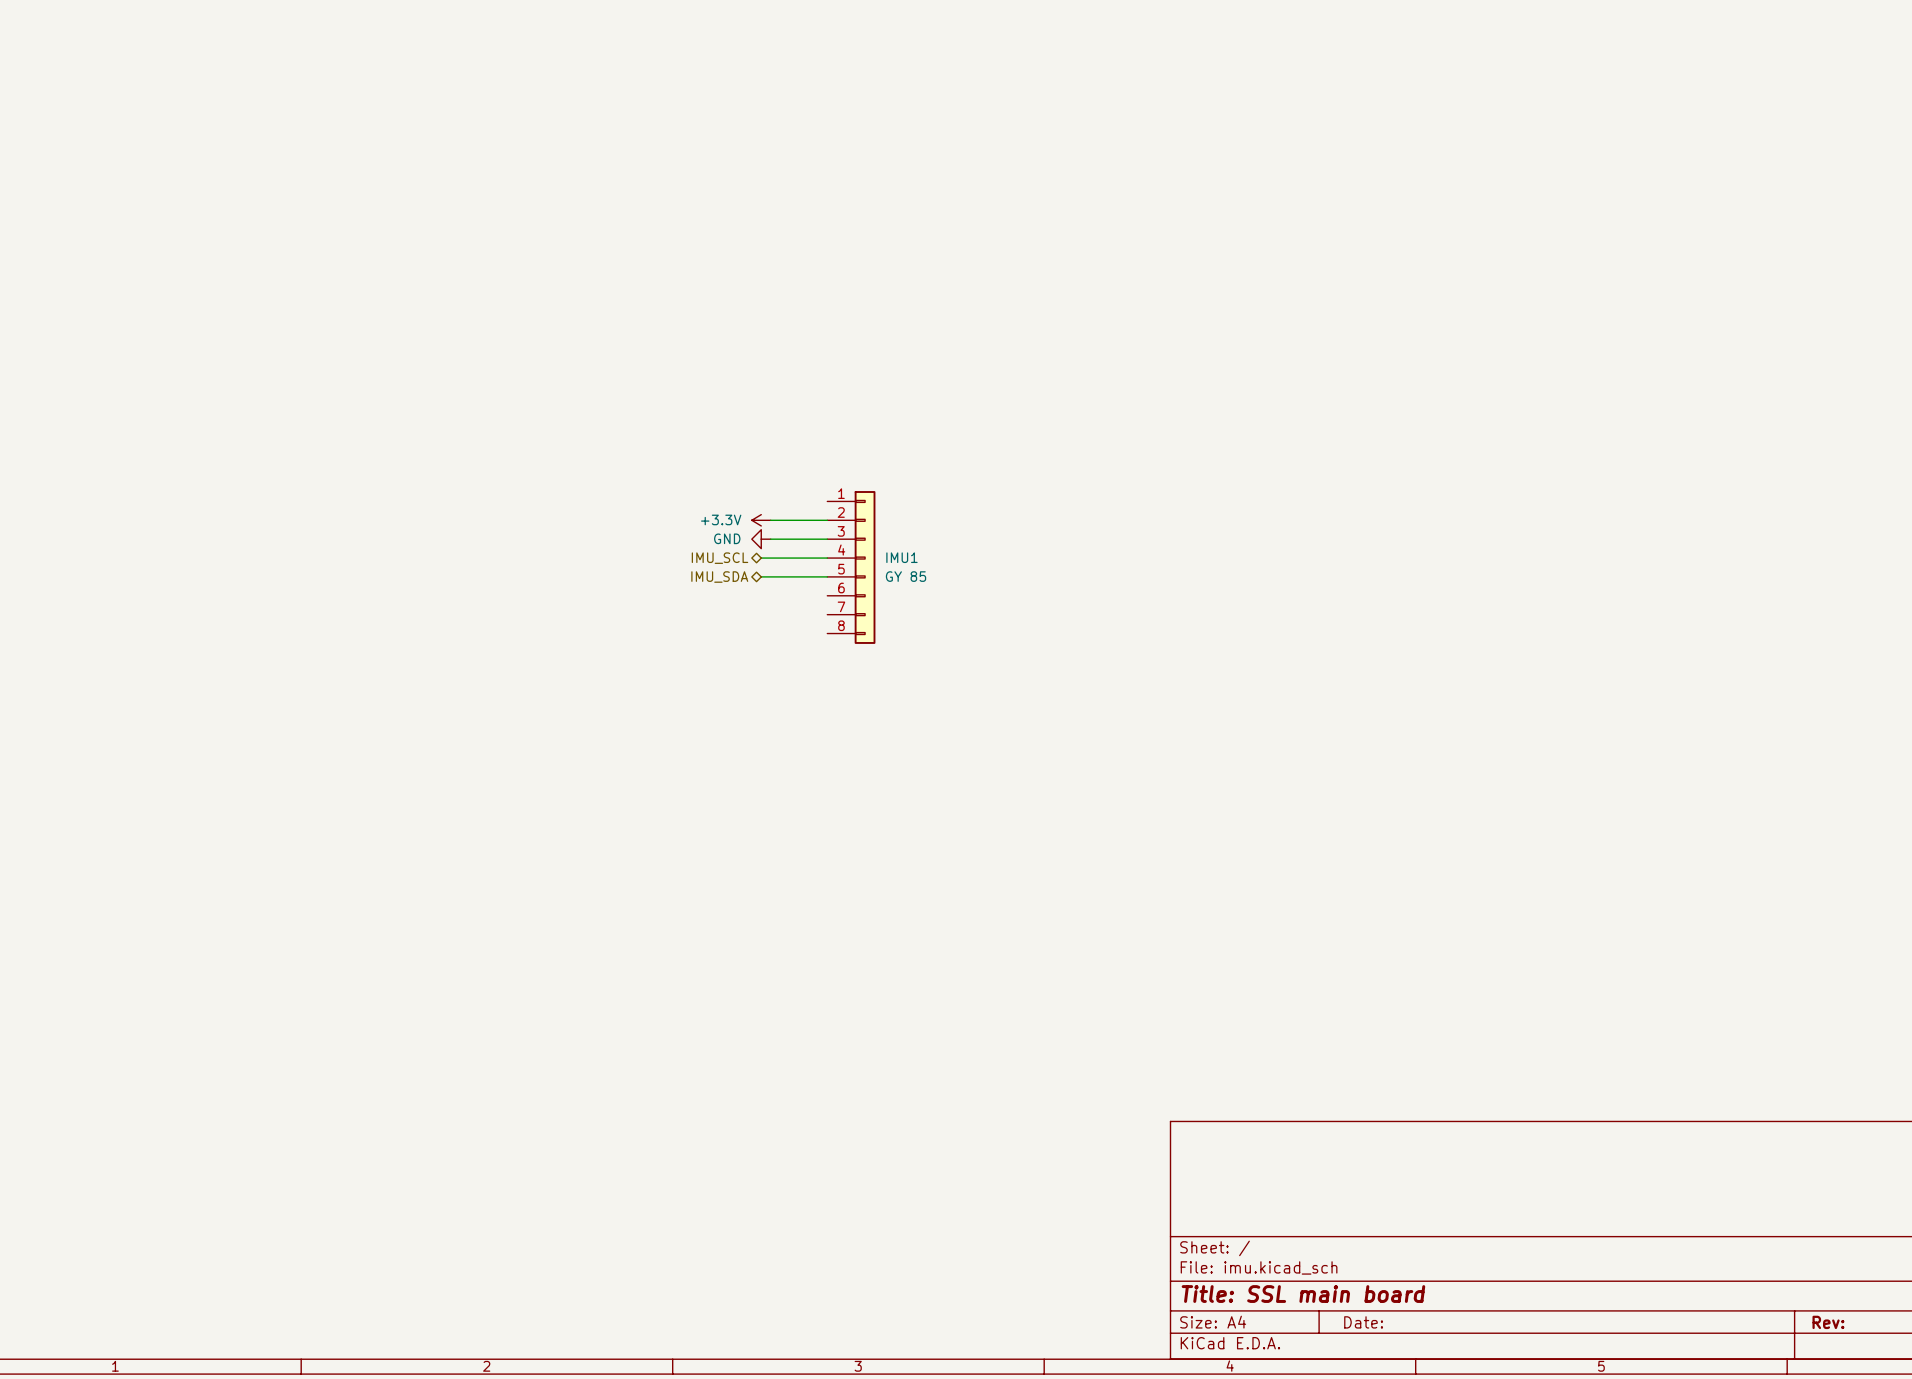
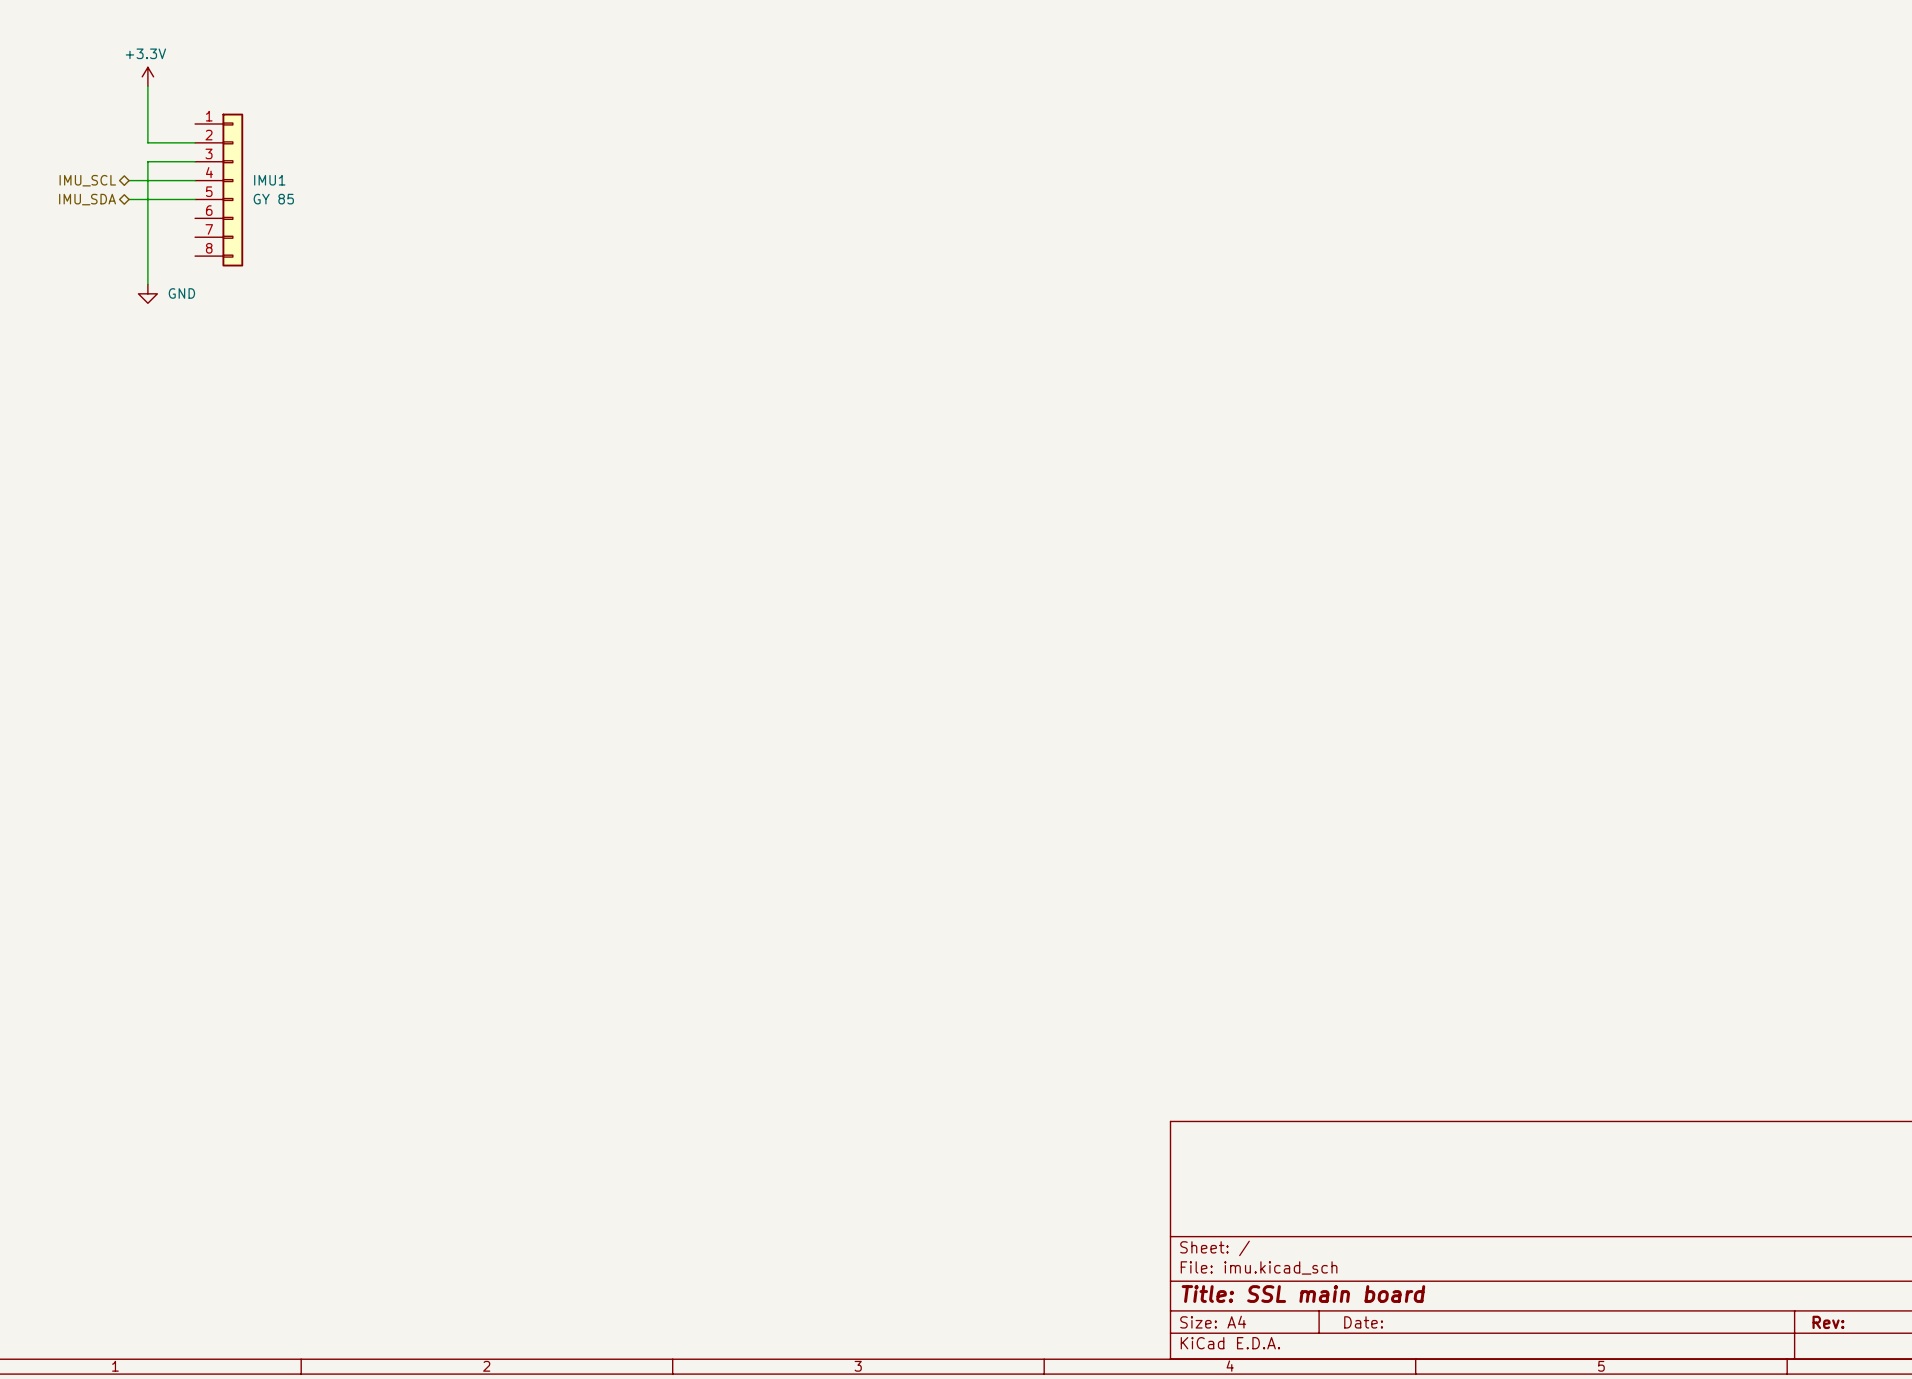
power symbol: none -> +3.3V (147, 76)
wire: none -> (147, 86) (147, 142) (195, 142)
wire: none -> (195, 161) (147, 161) (147, 284)
hierarchical label: none -> IMU_SCL (87, 180)
wire: none -> (129, 180) (195, 180)
hierarchical label: none -> IMU_SDA (87, 199)
wire: none -> (129, 199) (195, 199)
power symbol: none -> GND (147, 293)
power symbol: +3.3V (761, 520) -> none
wire: (770, 520) (827, 520) -> none
power symbol: GND (761, 539) -> none
wire: (770, 539) (827, 539) -> none
hierarchical label: IMU_SCL (719, 558) -> none
wire: (761, 558) (827, 558) -> none
IMU1 position: (851, 567) -> (219, 190)
wire: (761, 576) (827, 576) -> none
hierarchical label: IMU_SDA (719, 577) -> none

